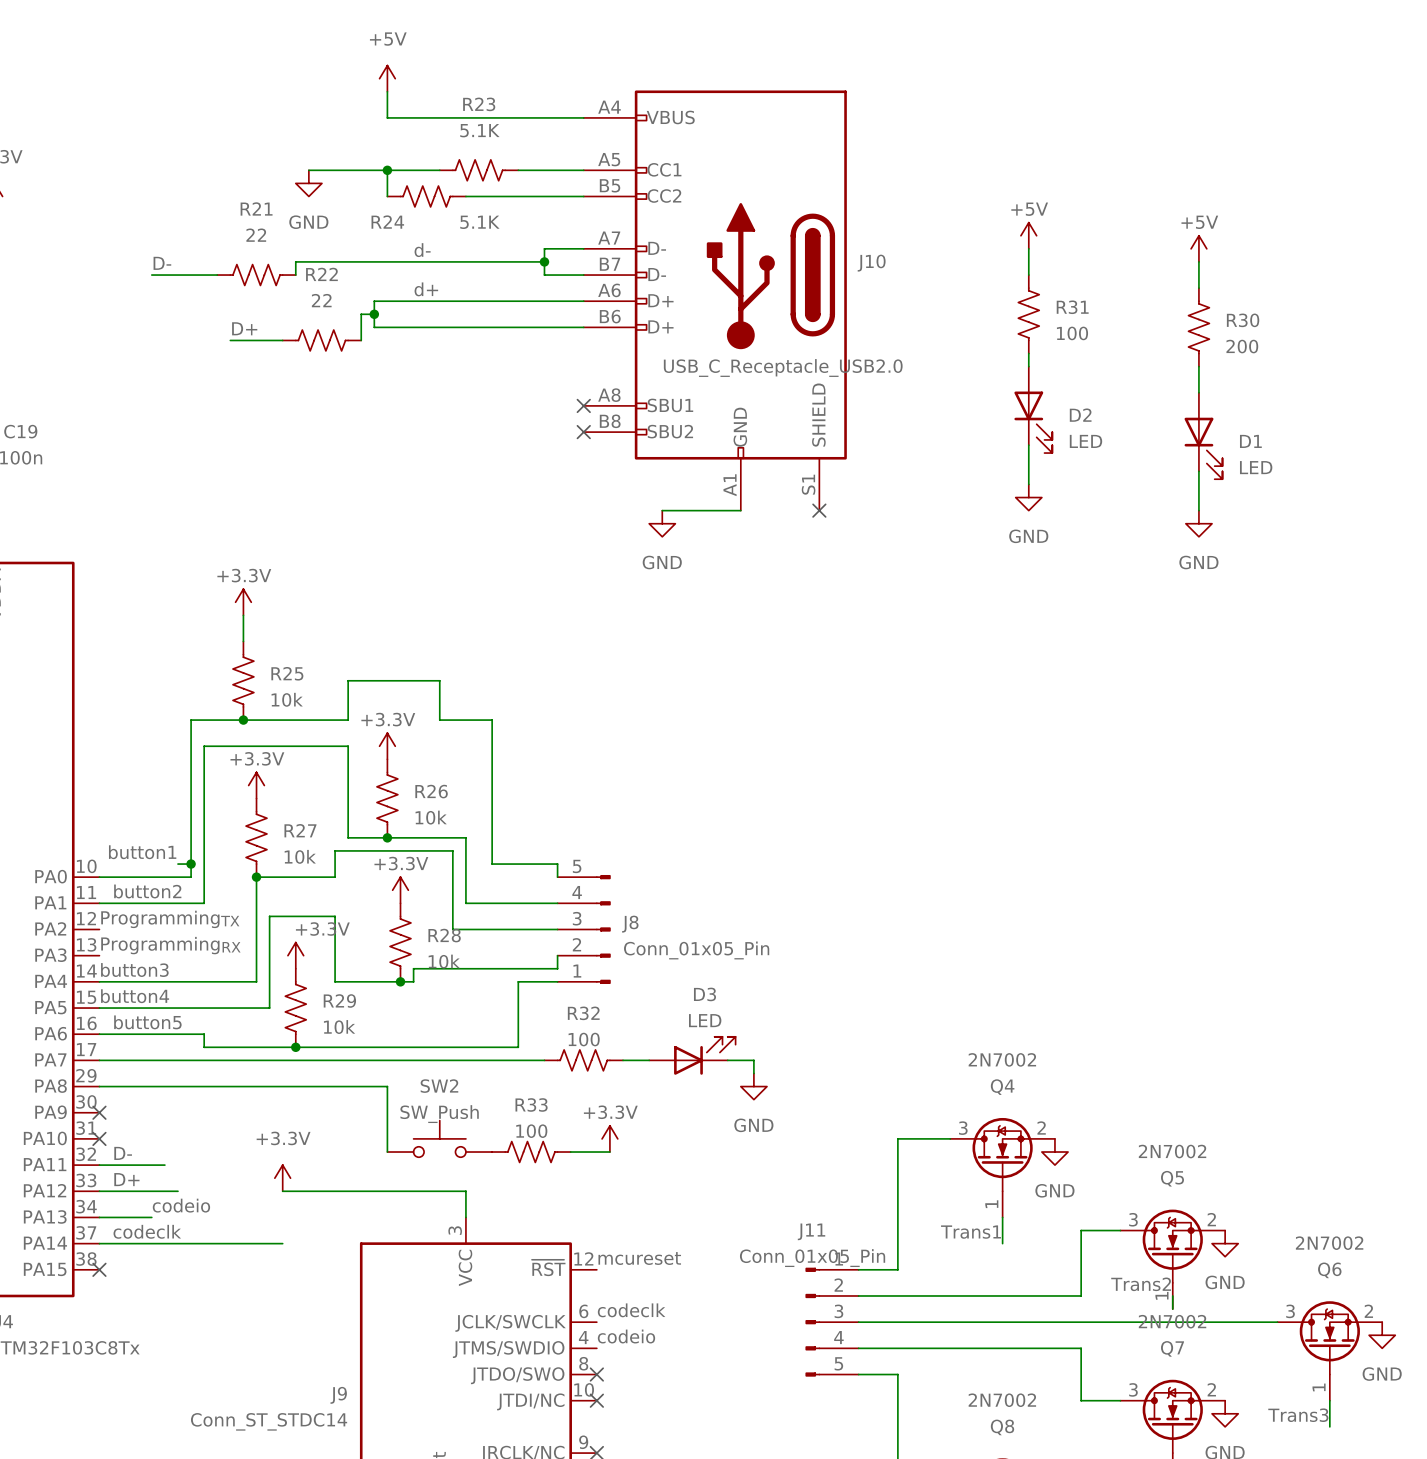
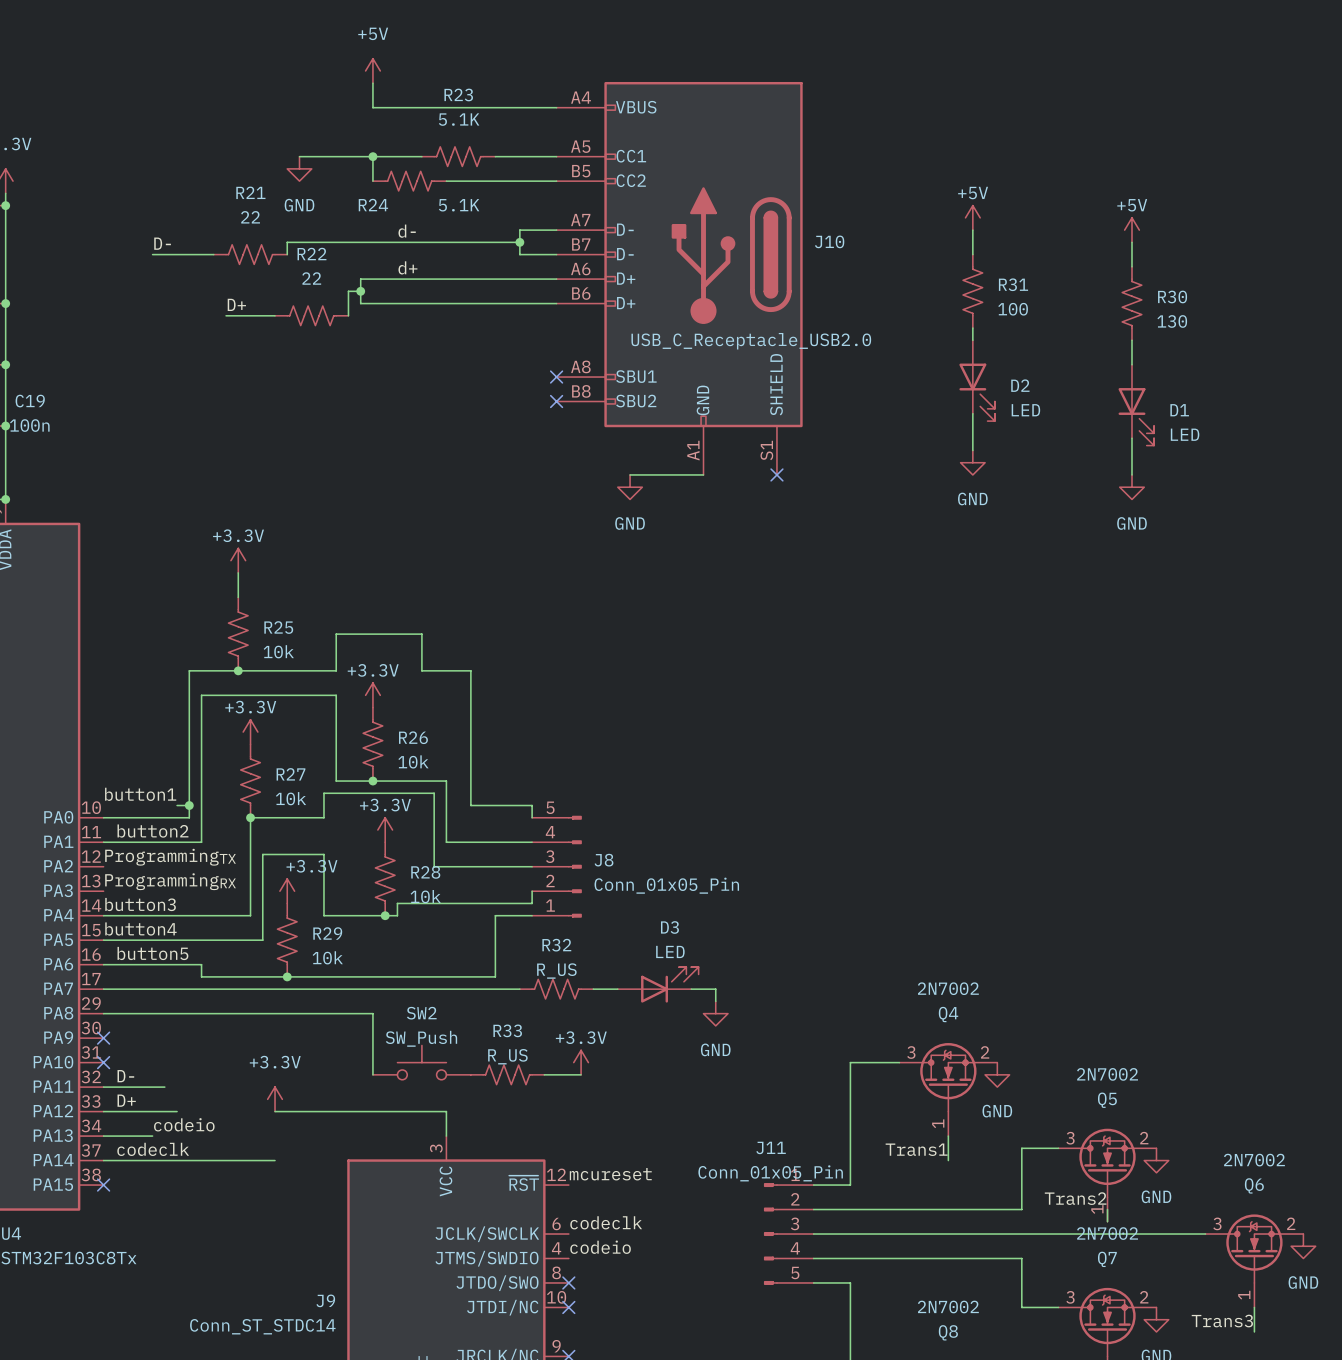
R30 value: 200 (1242, 346) -> 130 (1172, 321)
R32 value: 100 (584, 1039) -> R_US (556, 971)
R33 value: 100 (531, 1131) -> R_US (507, 1056)

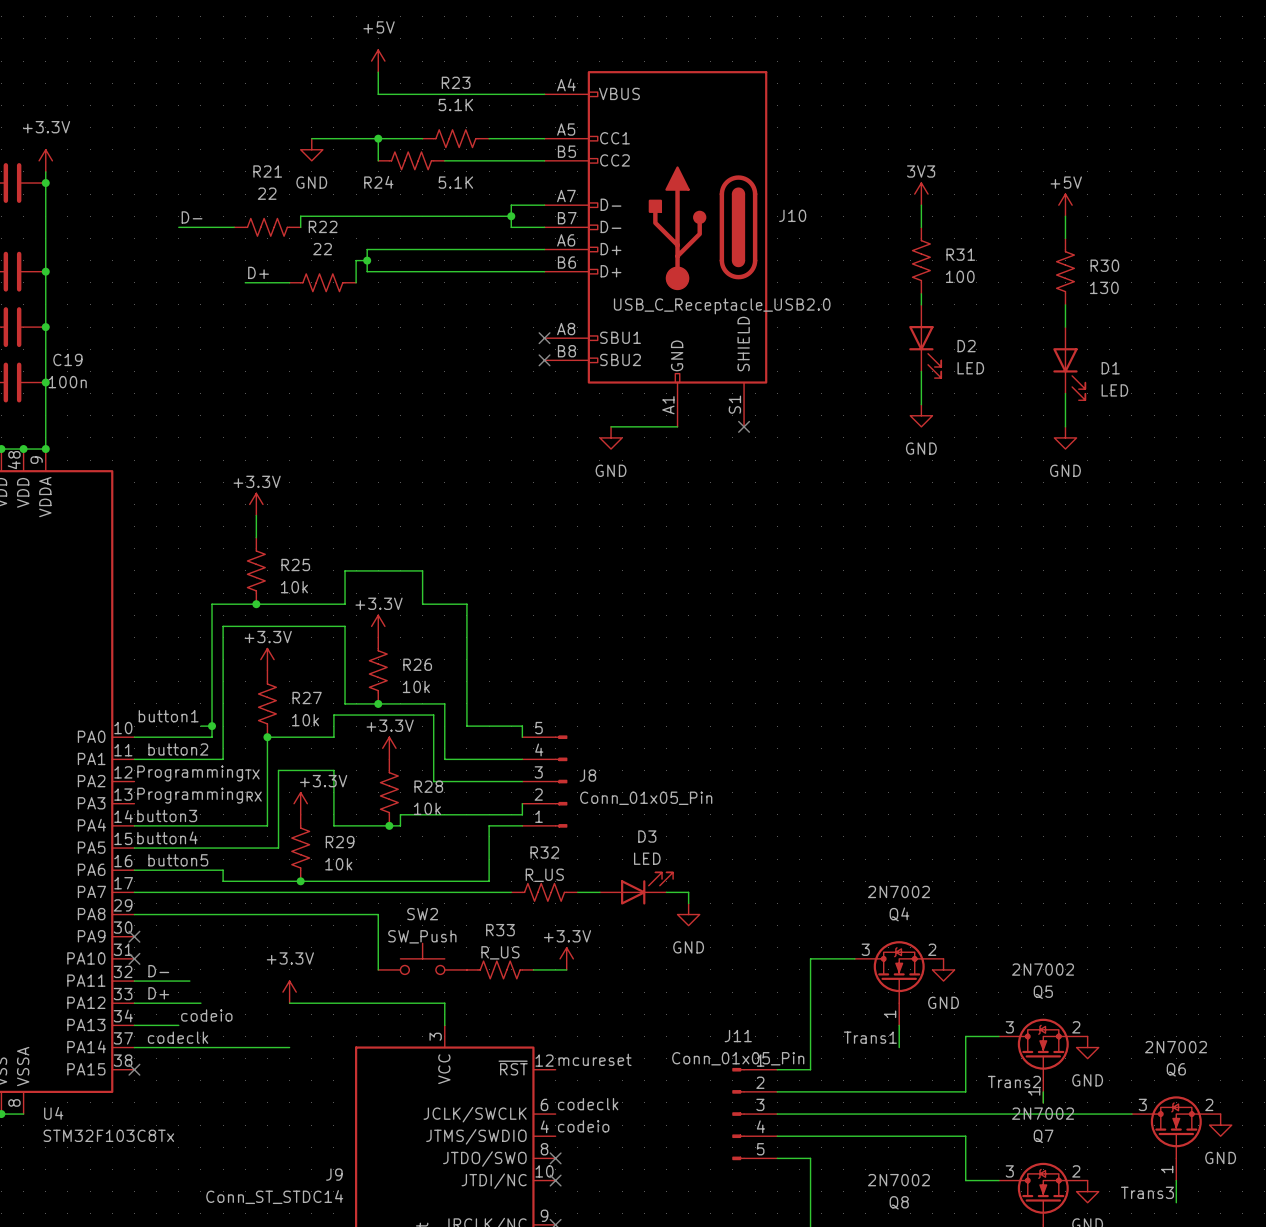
power symbol: +5V (972, 217) -> 3V3 (921, 194)
label: d- (407, 231) -> none
label: d+ (407, 267) -> none

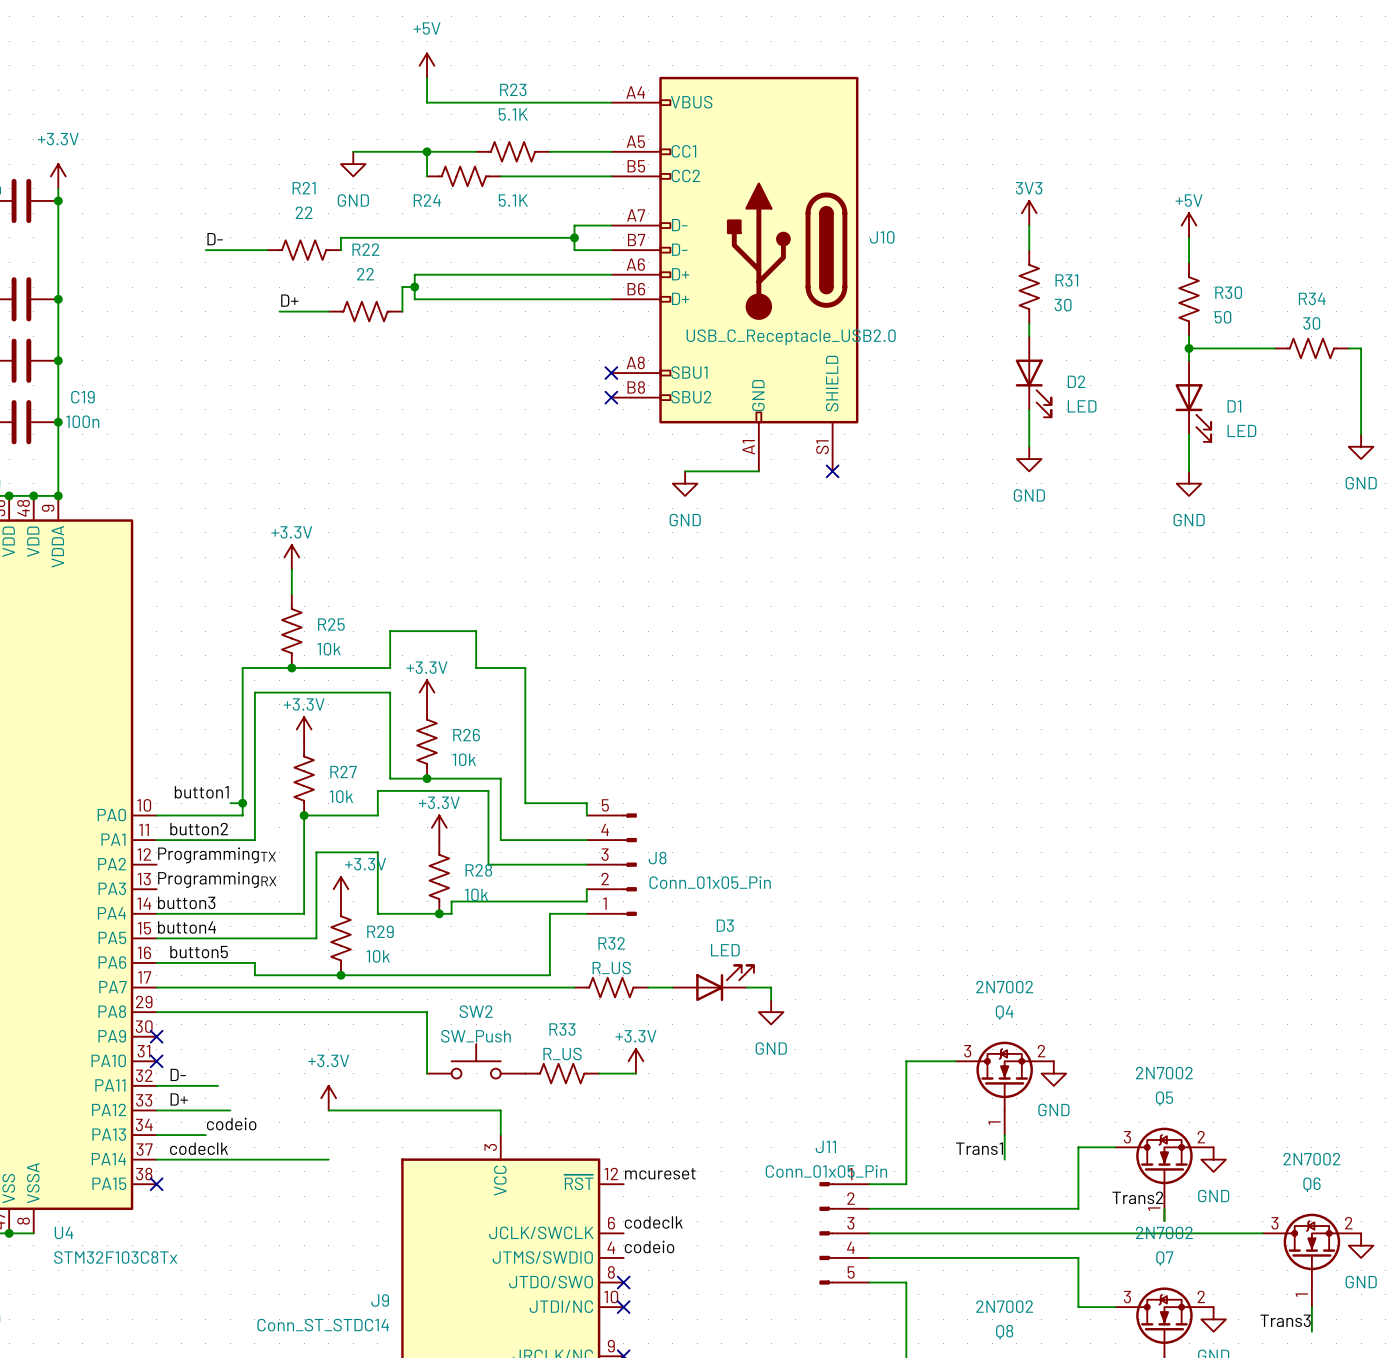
R31 value: 100 (960, 276) -> 30 (1063, 304)
R30 value: 130 (1104, 287) -> 50 (1223, 317)
wire: none -> (1189, 348) (1275, 348)
junction: none -> (1189, 348)
R34: none -> 30 (1311, 348)
wire: none -> (1348, 348) (1361, 348) (1361, 434)
power symbol: none -> GND (1361, 446)

